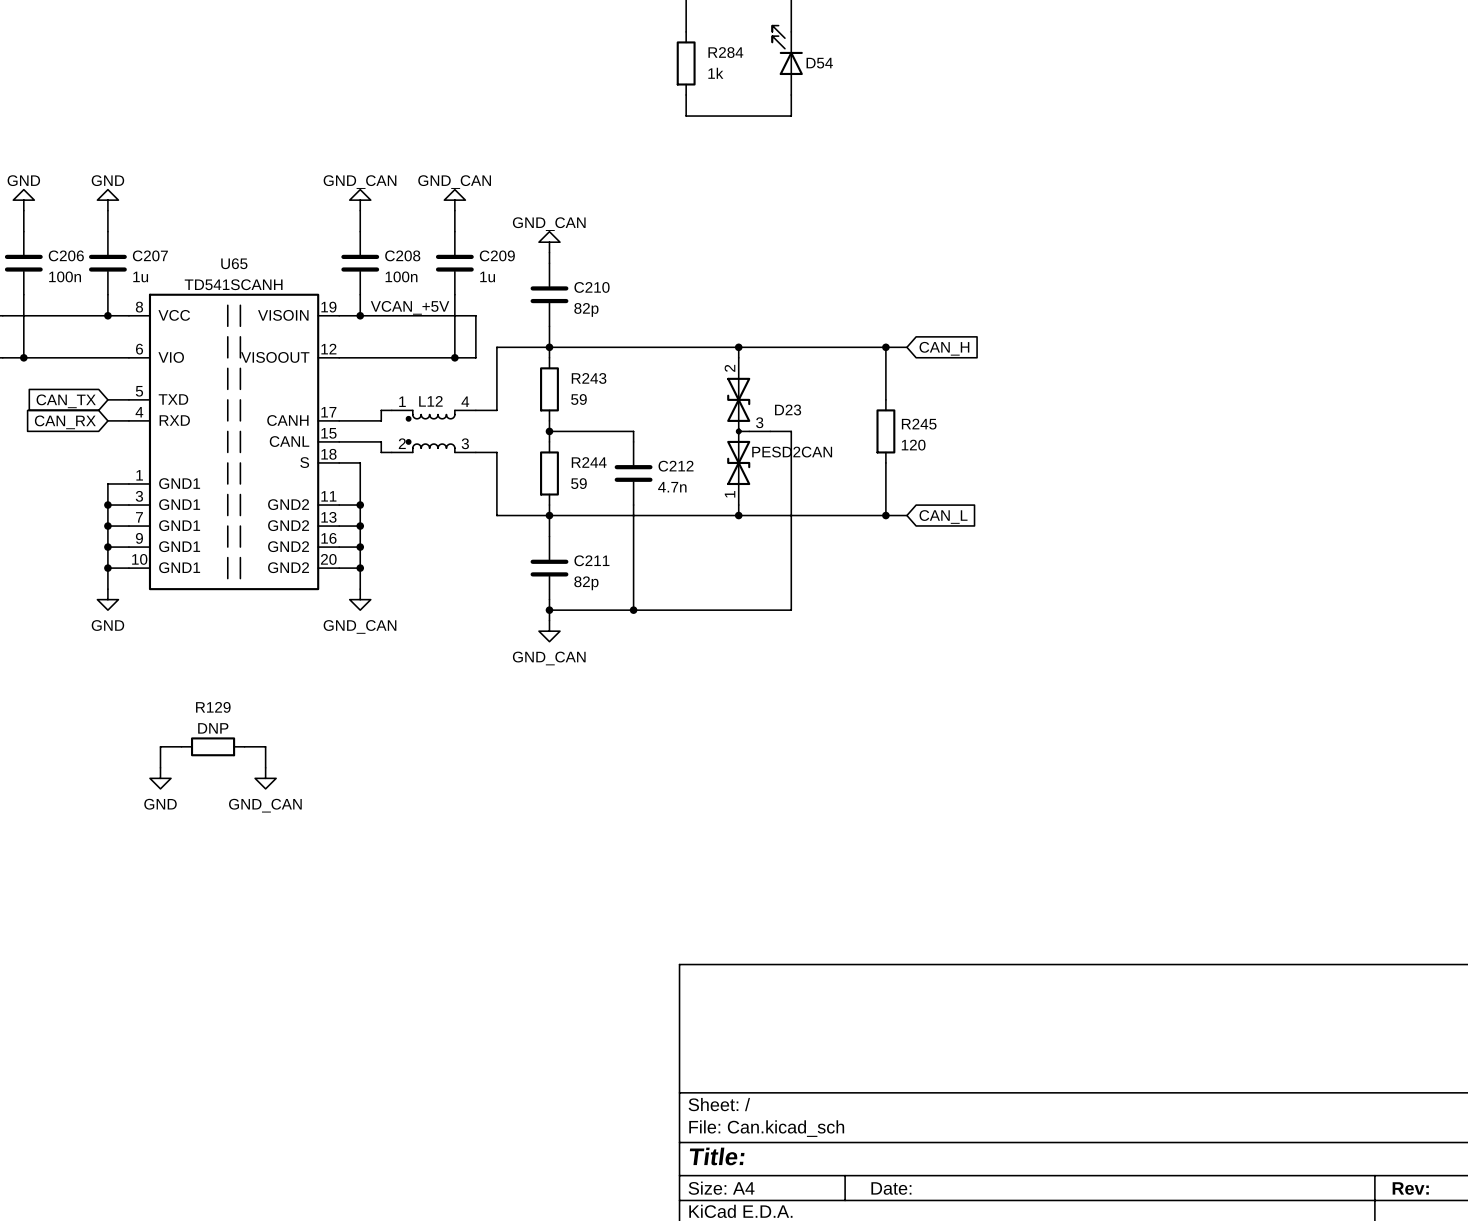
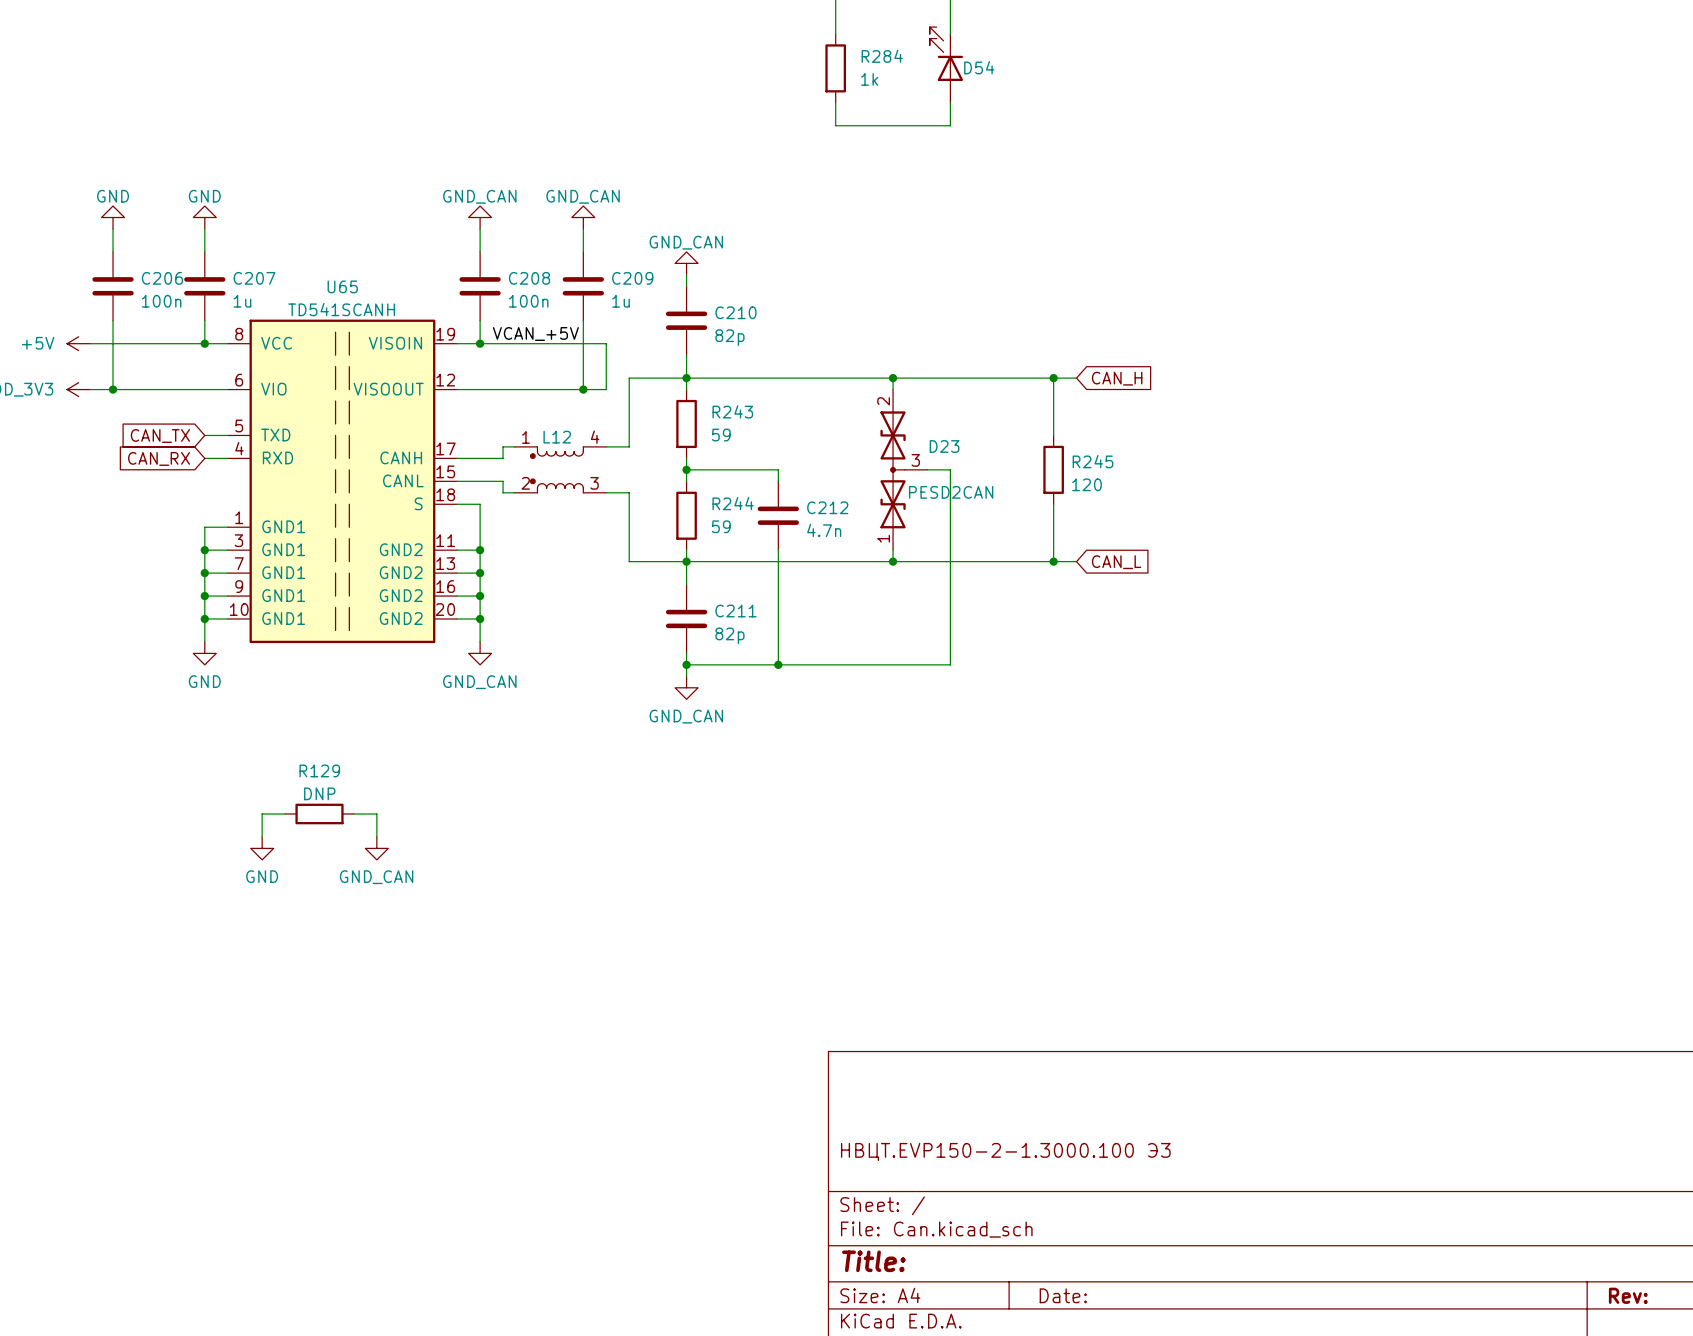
title block: none -> НВЦТ.EVP150-2-1.3000.100 Э3 (1005, 1151)

